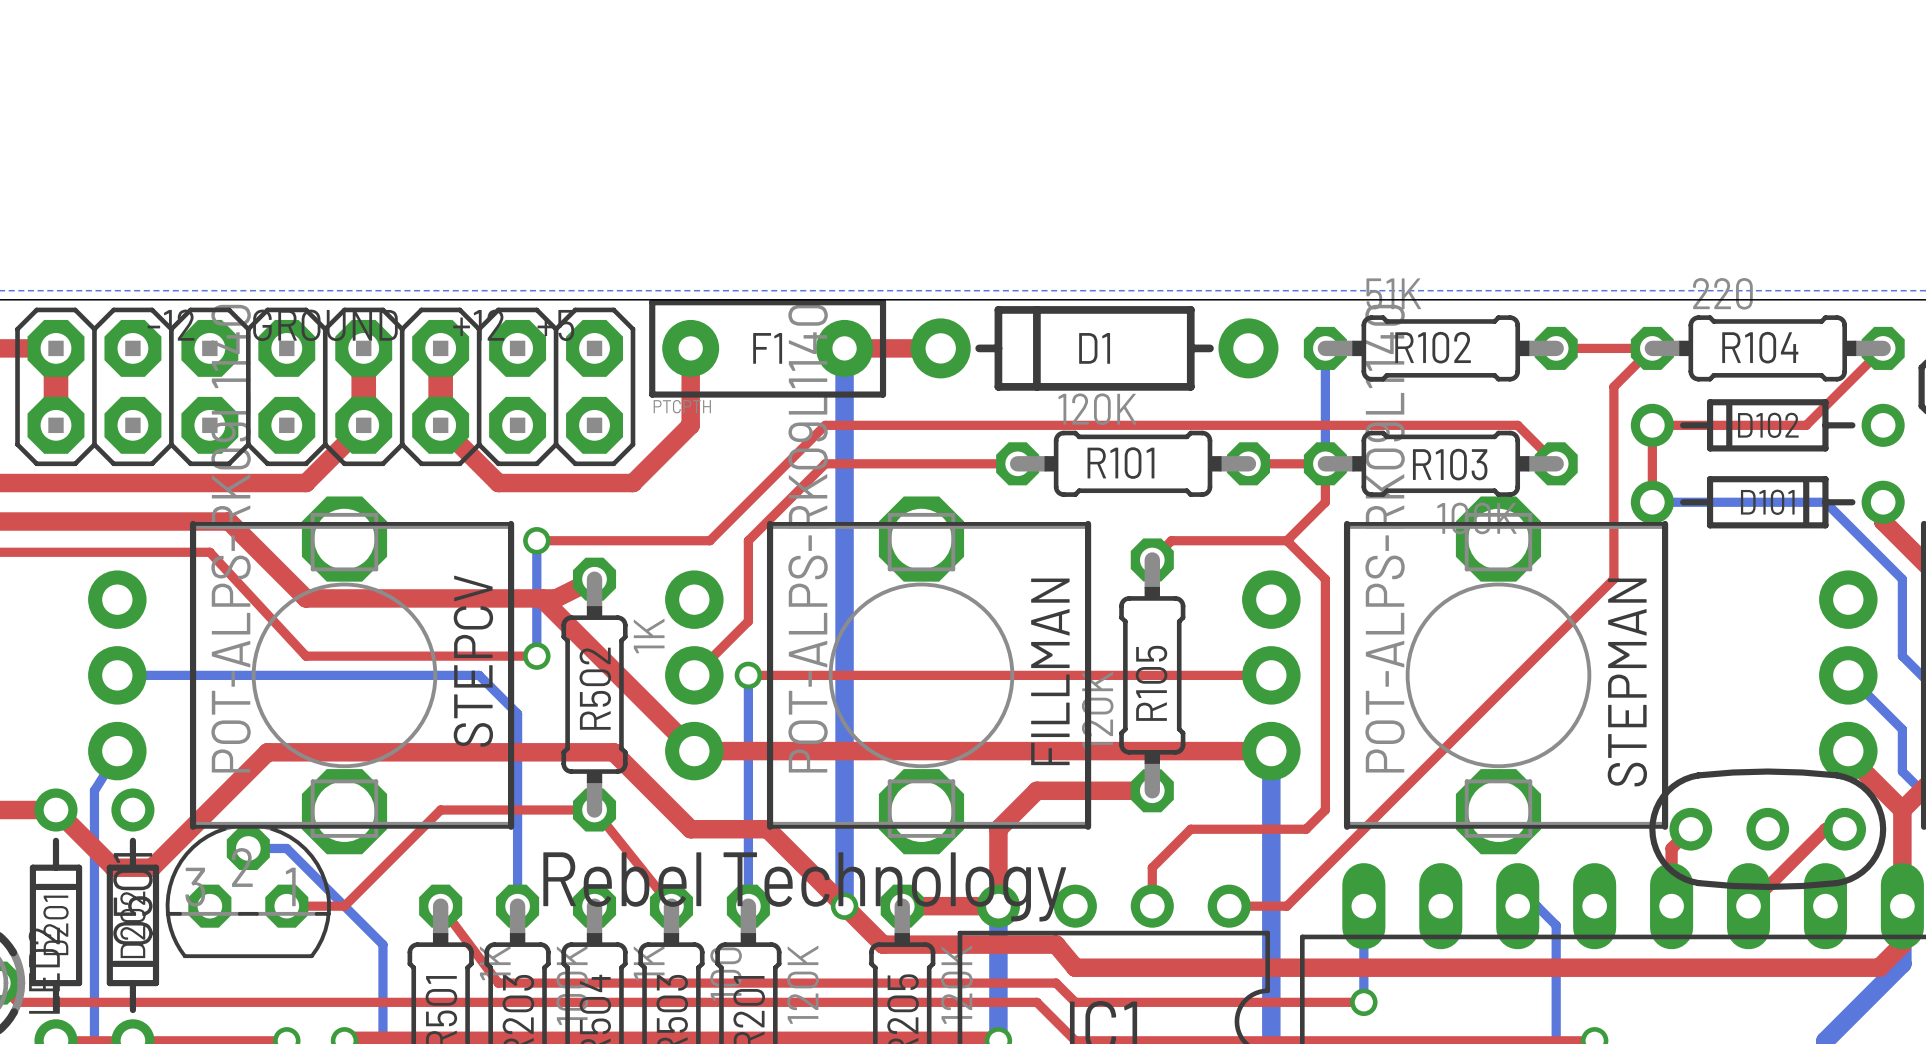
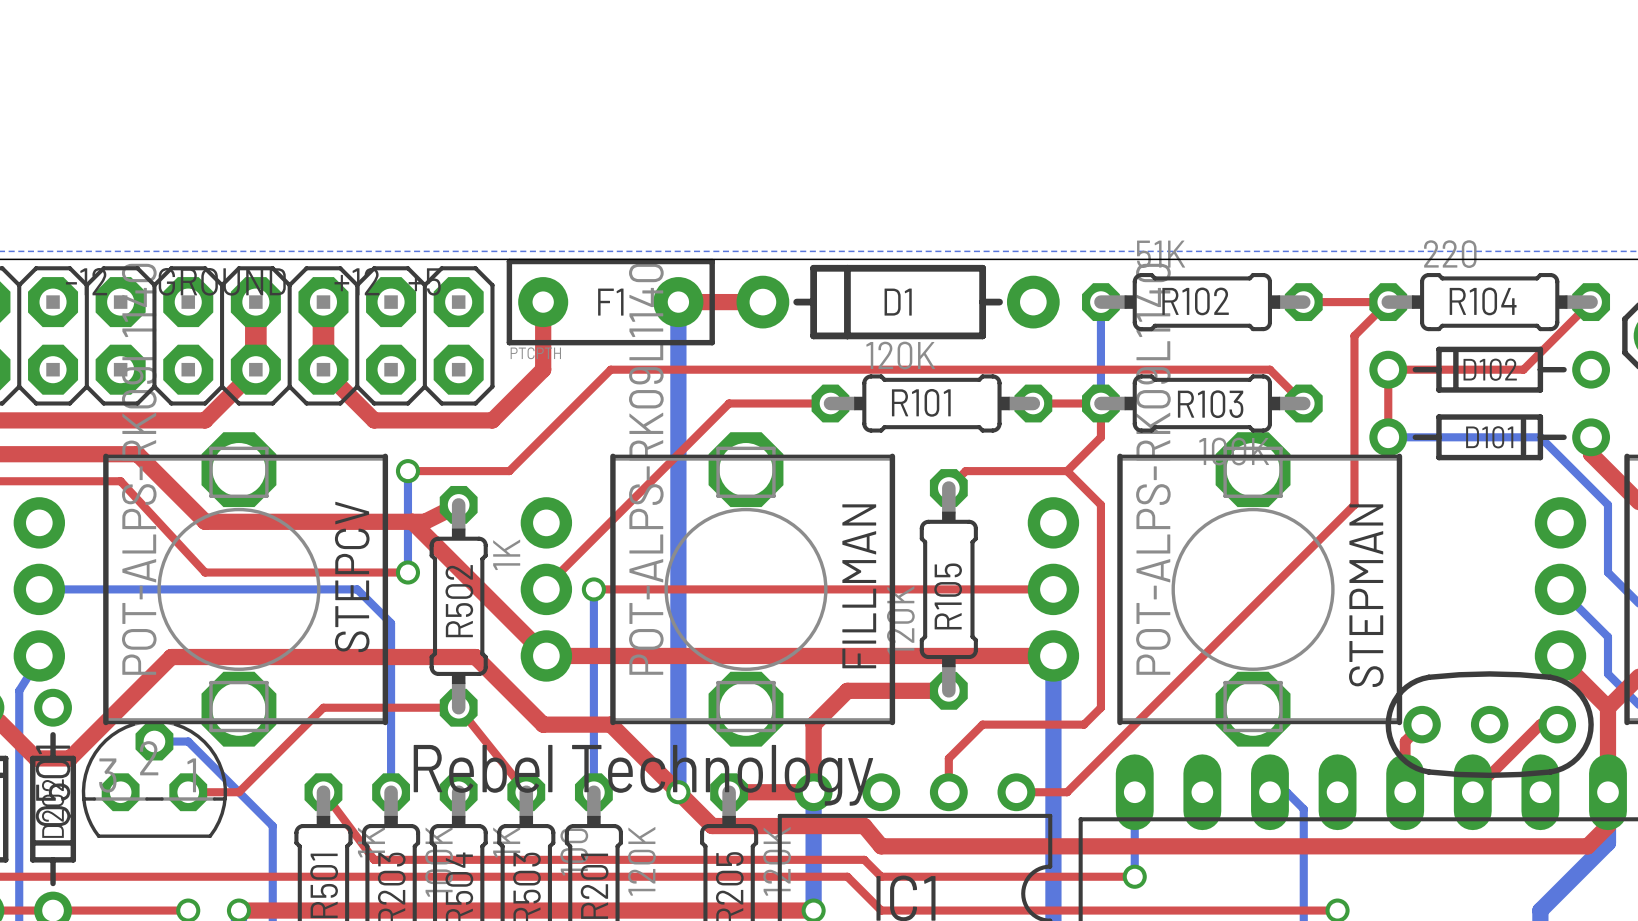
top track: (825, 425) (709, 540) (652, 540) -> (661, 369) (610, 369) (509, 471)
top track: (902, 463) (825, 463) (748, 540) (748, 621) (694, 675) -> (729, 403) (546, 586) (546, 589)

